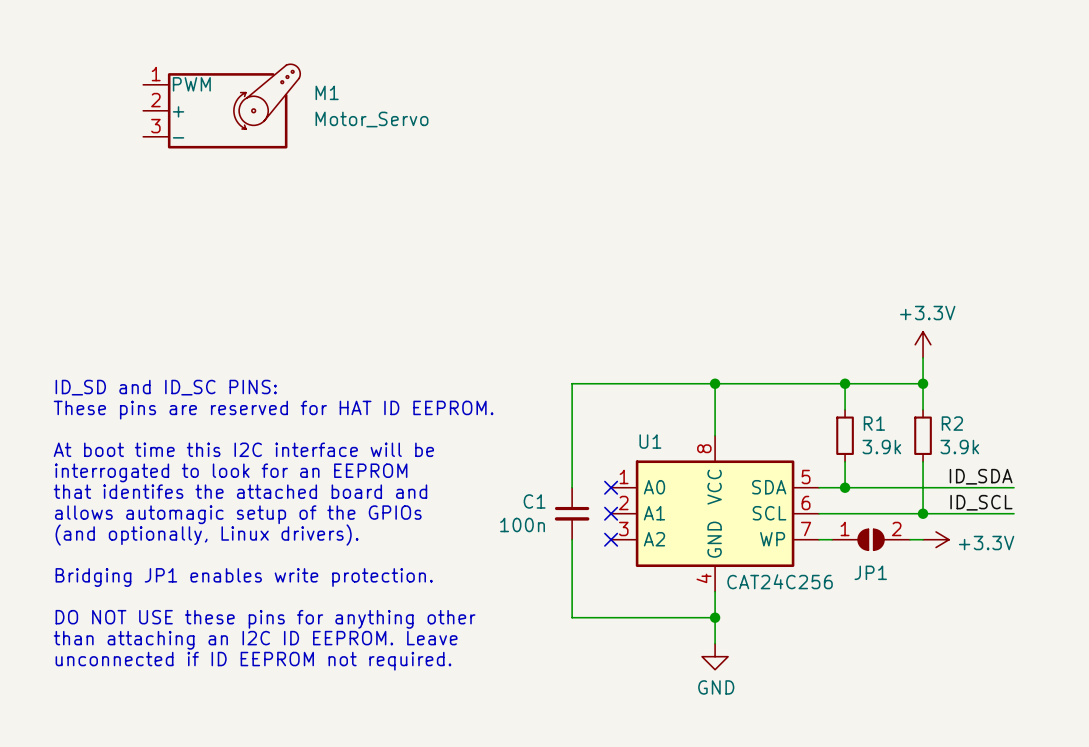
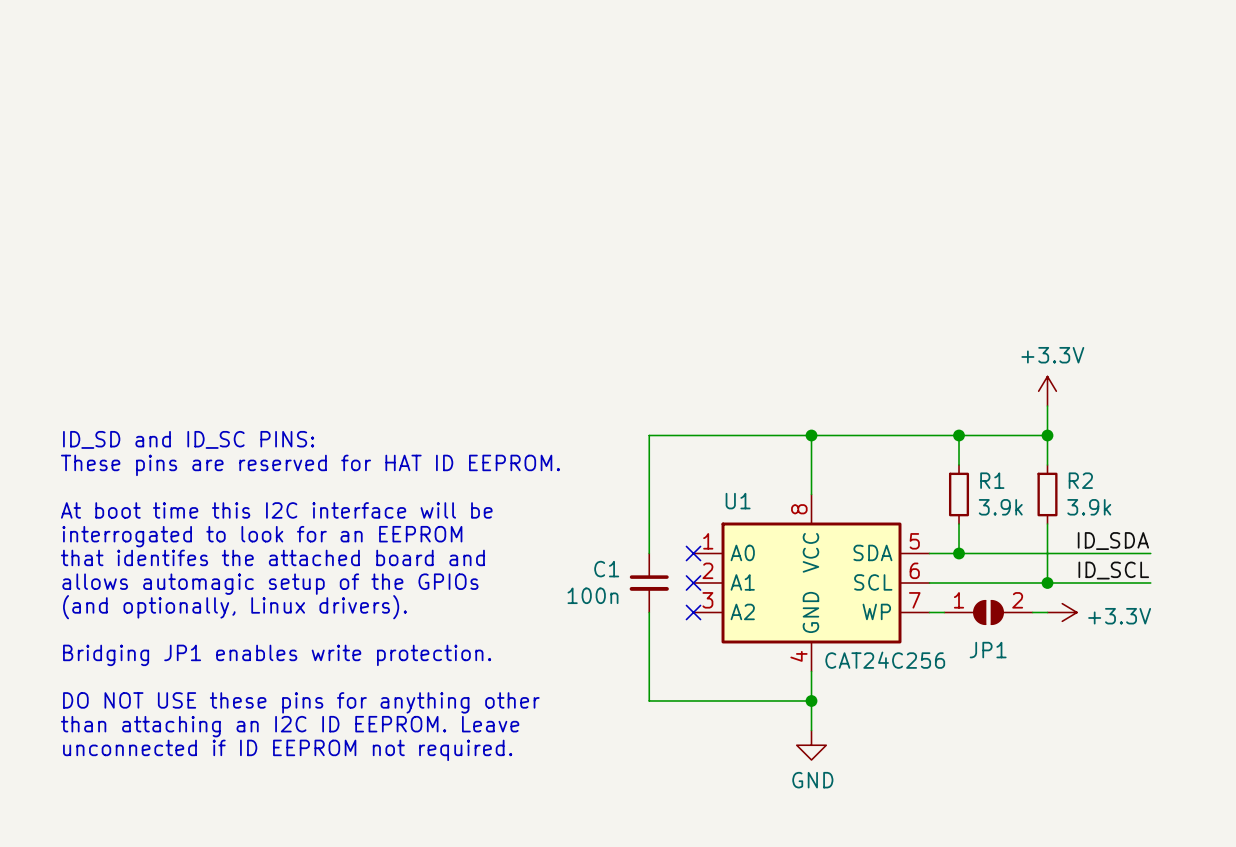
M1: Motor_Servo (221, 106) -> none

